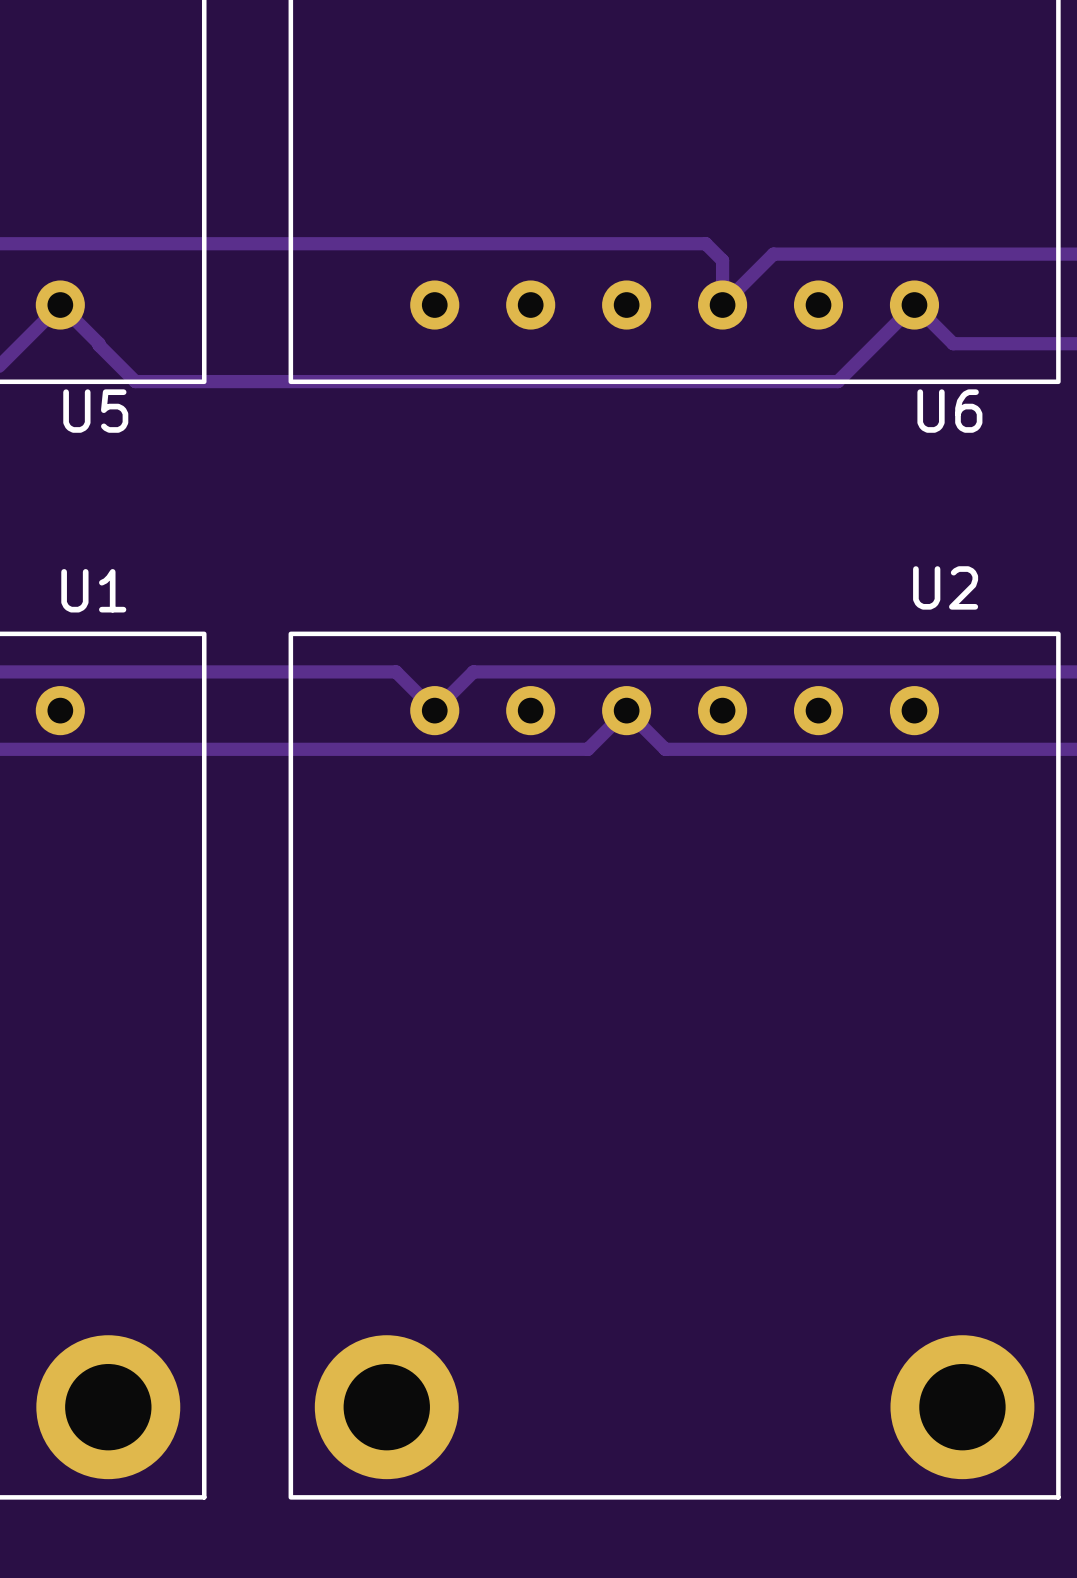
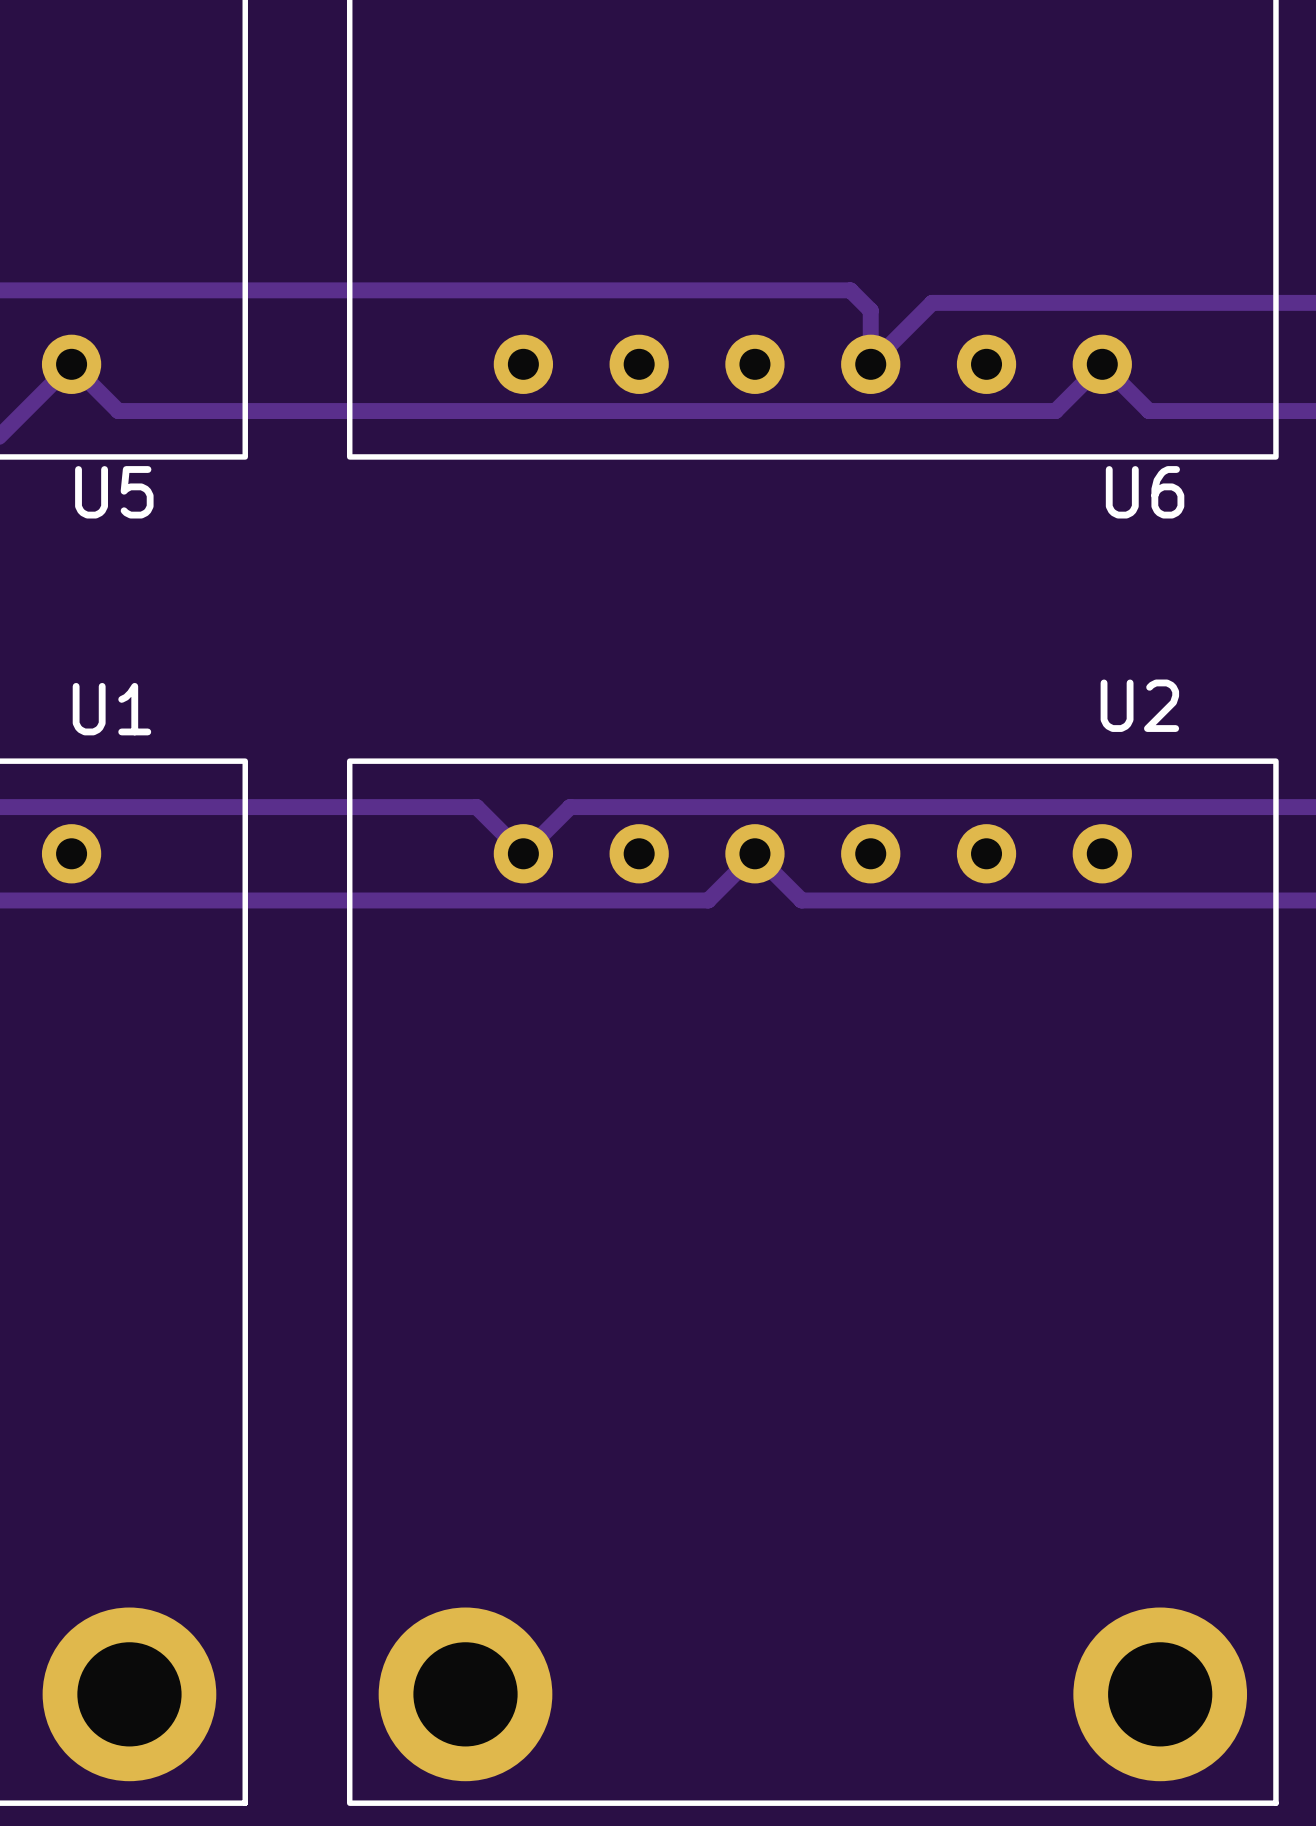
track: (99, 343) (135, 381) (837, 381) (875, 343) -> (118, 411) (1055, 411)

